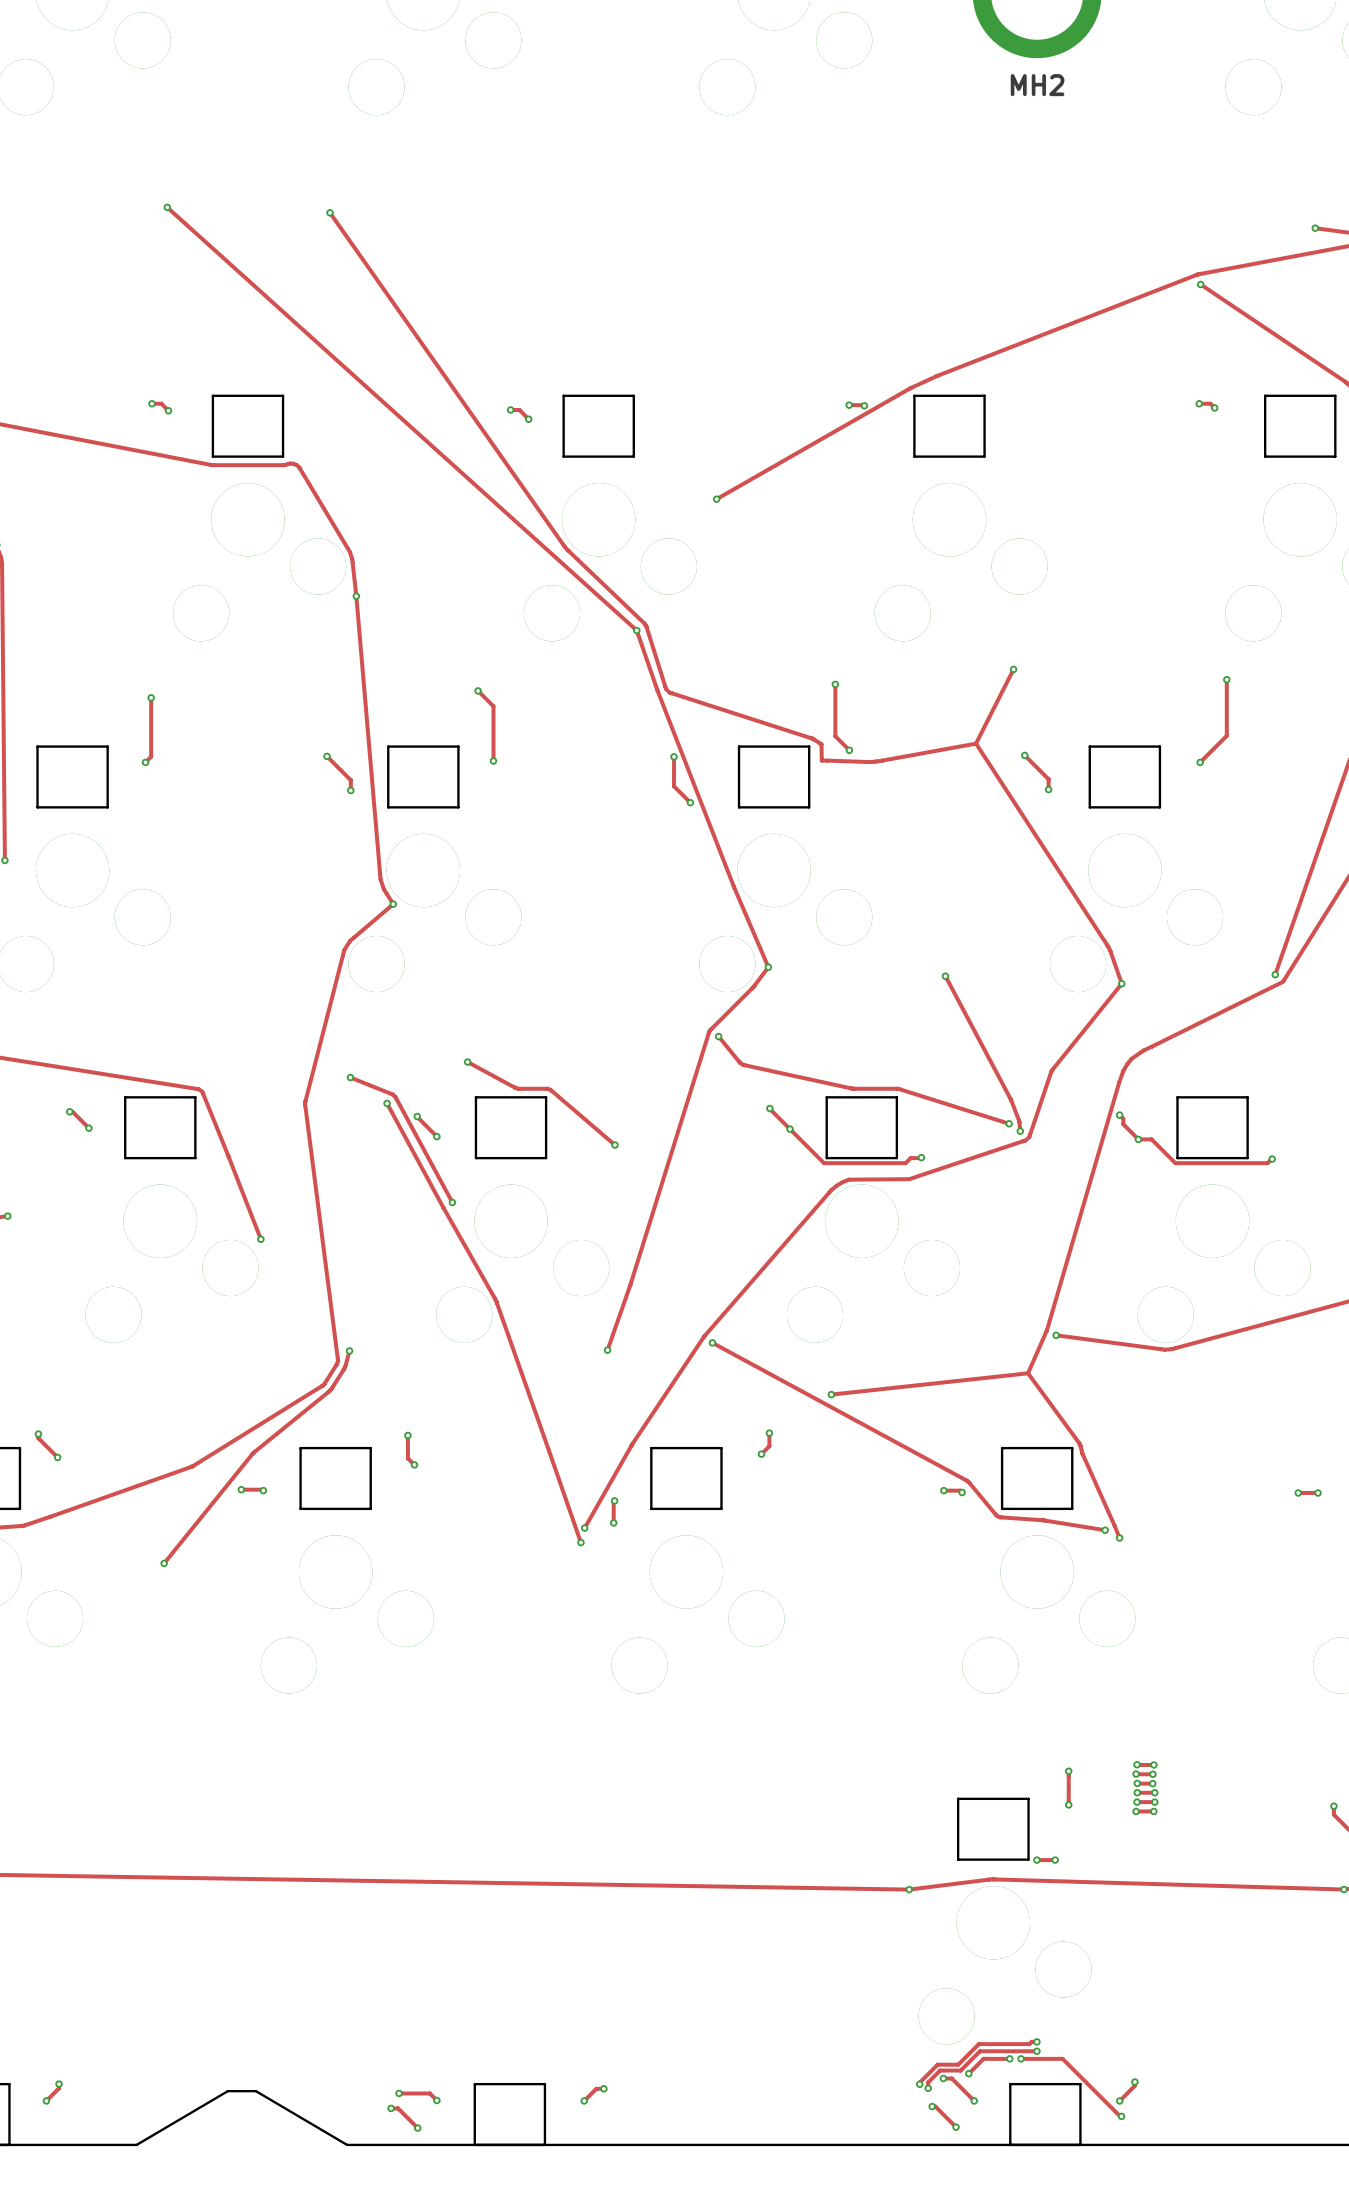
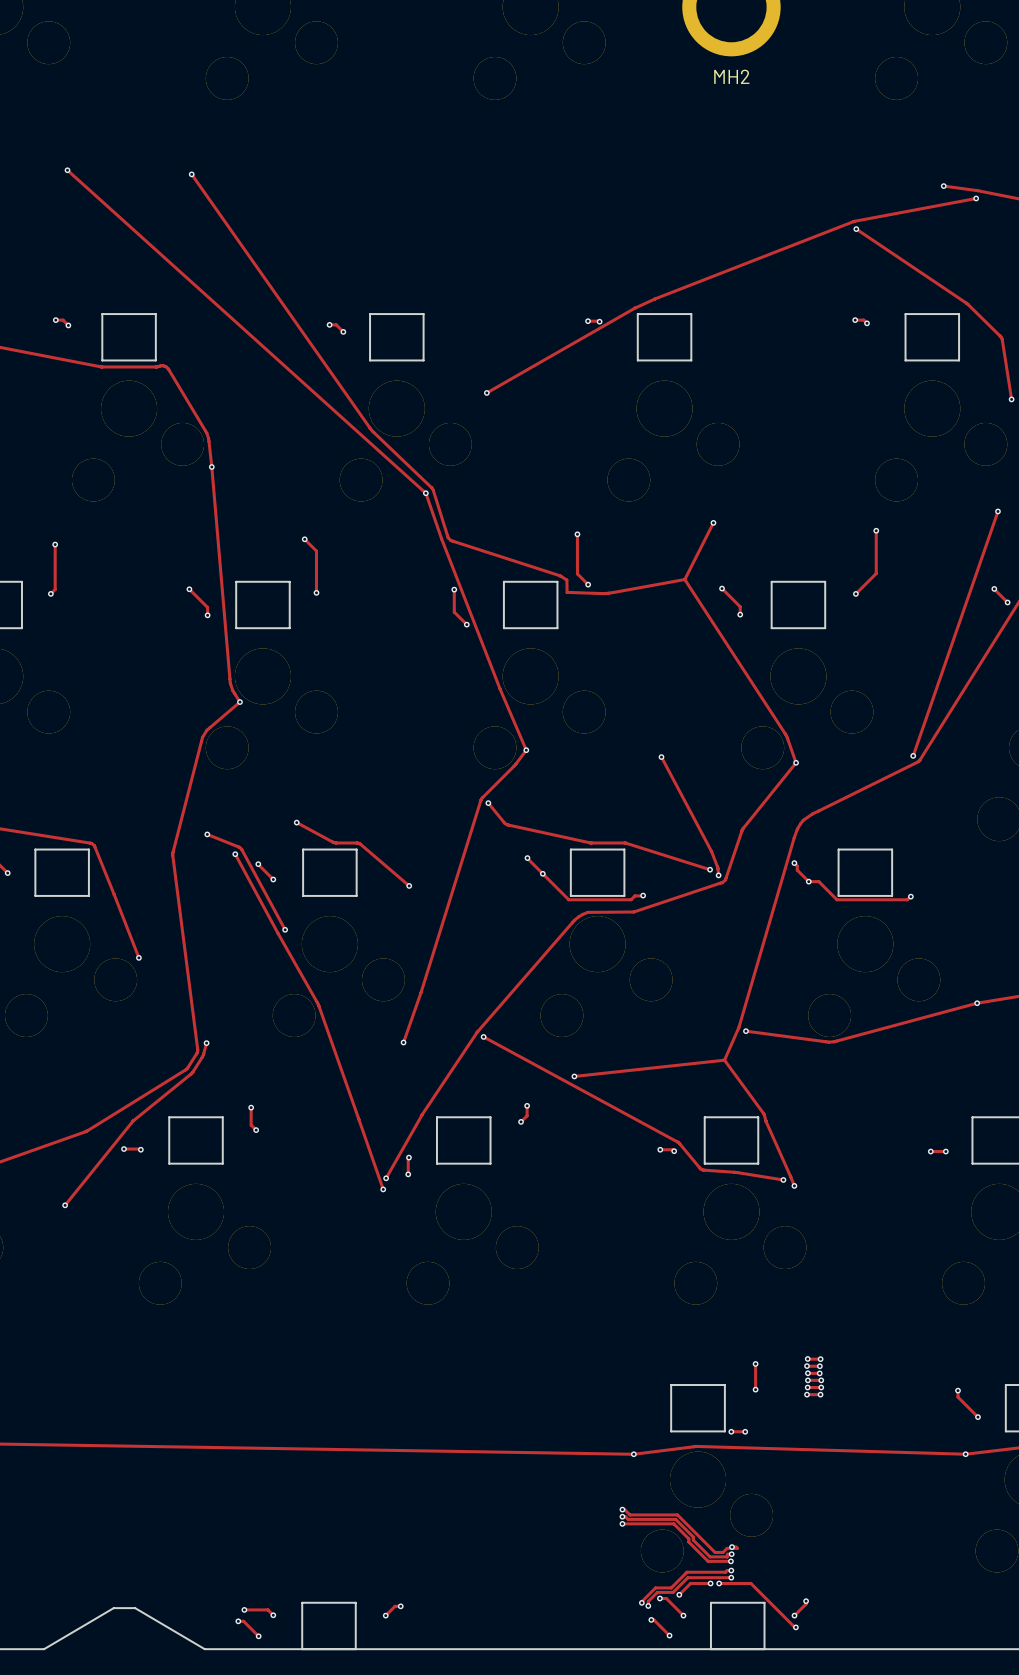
track: none -> (622, 1509) (629, 1514) (677, 1514) (715, 1552) (723, 1552) (727, 1548) (737, 1548) (732, 1547)
via: none -> (622, 1509)
track: none -> (622, 1516) (628, 1519) (675, 1519) (710, 1556) (727, 1556)
via: none -> (622, 1516)
track: none -> (622, 1523) (673, 1523) (708, 1561) (730, 1561)
via: none -> (622, 1523)
via: none -> (732, 1547)
track: none -> (731, 1554) (727, 1554) (727, 1556)
via: none -> (731, 1554)
via: none -> (730, 1561)

